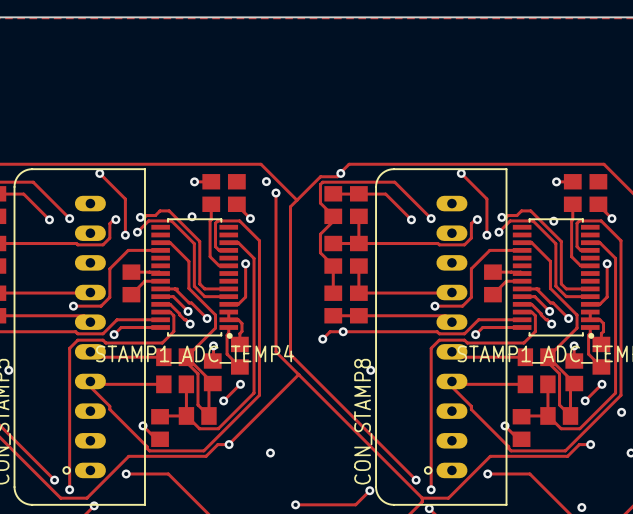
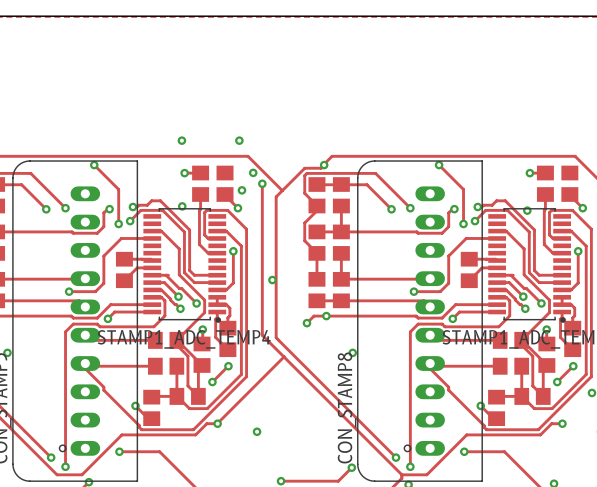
via: none -> (181, 140)
via: none -> (239, 140)
via: none -> (241, 190)
via: none -> (272, 280)

